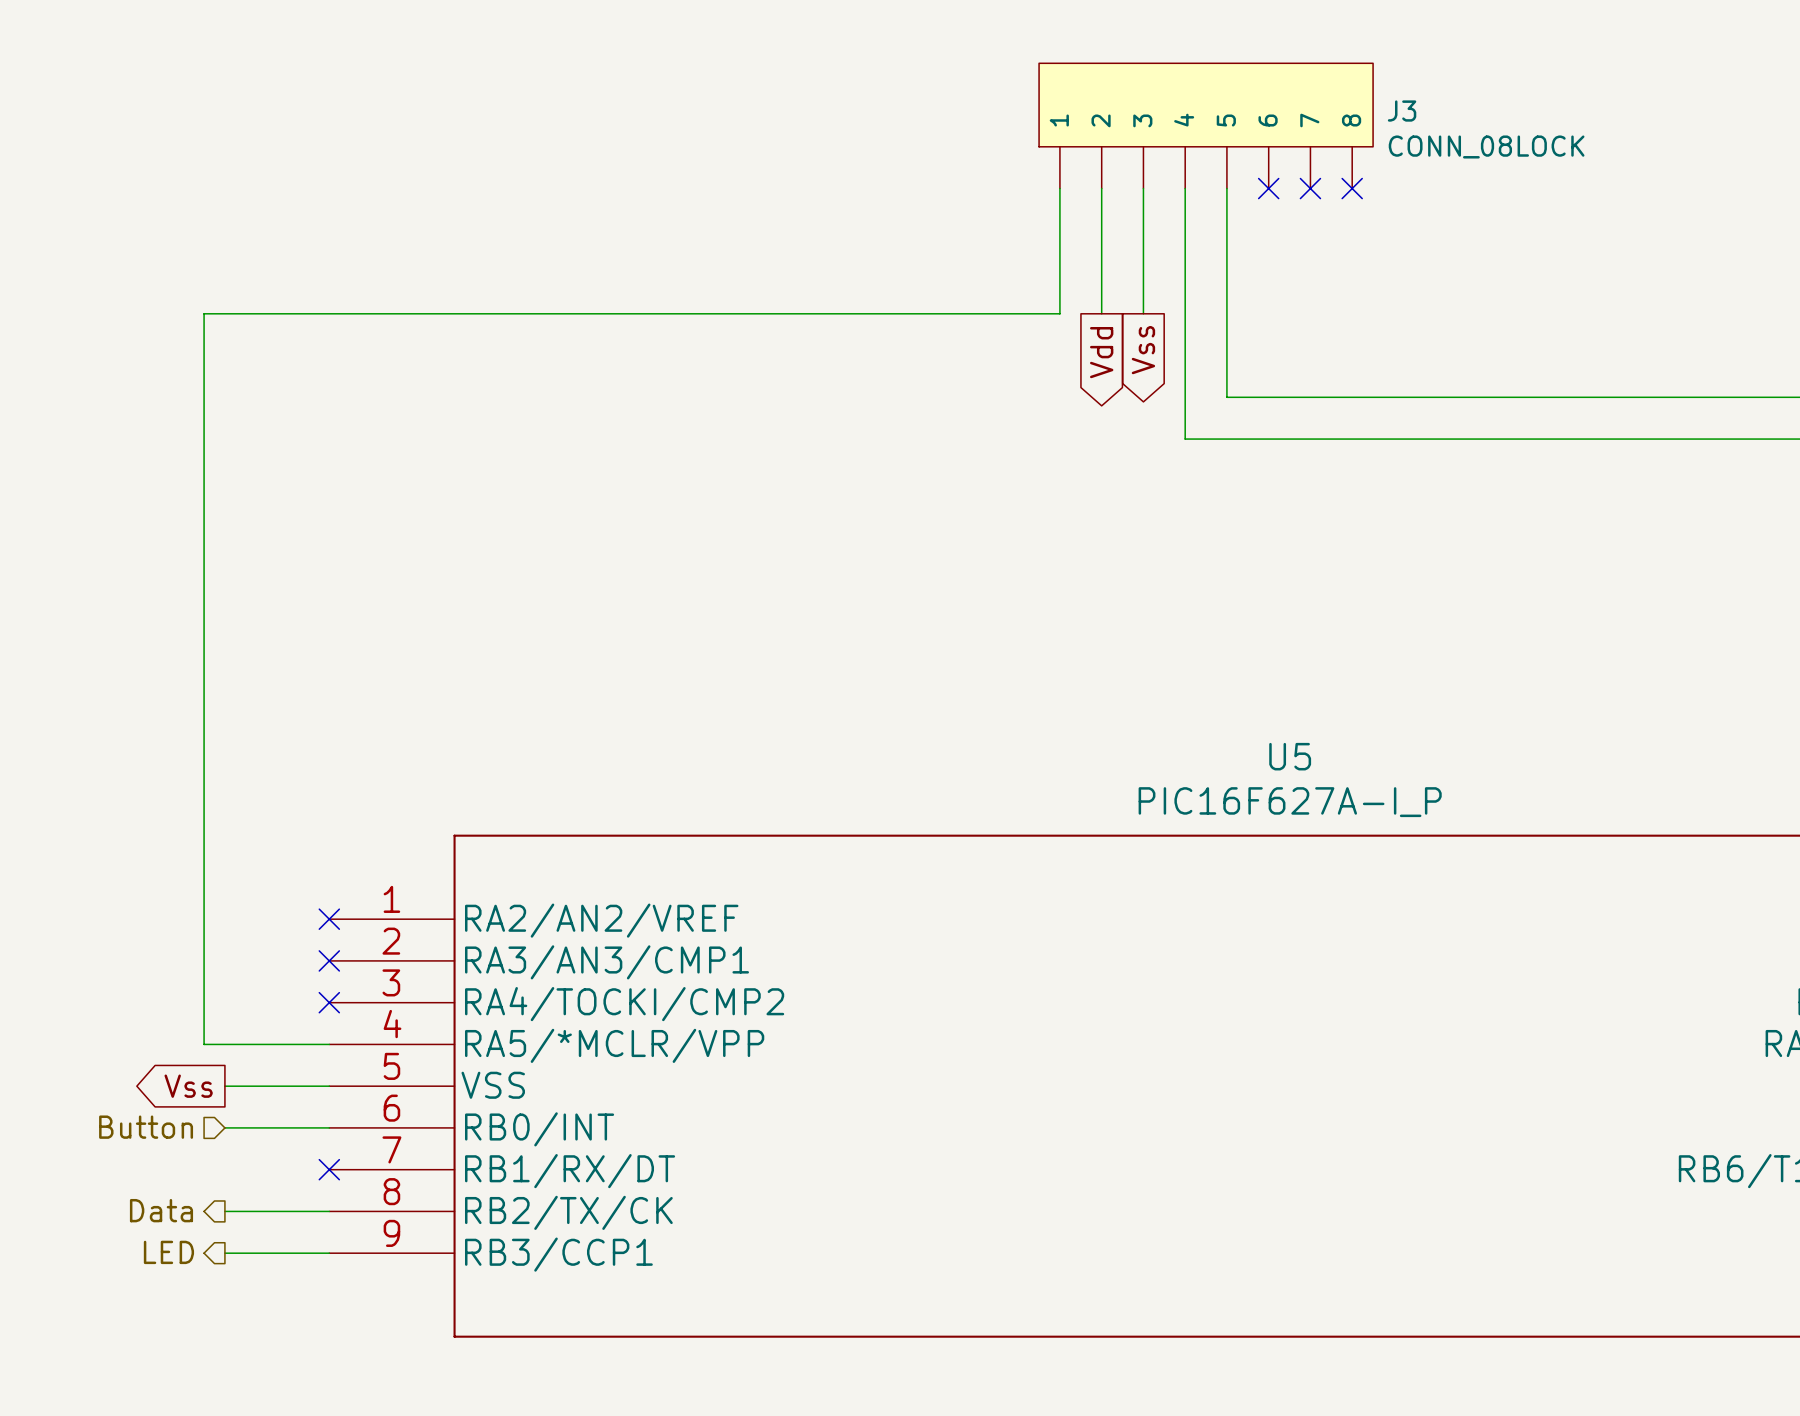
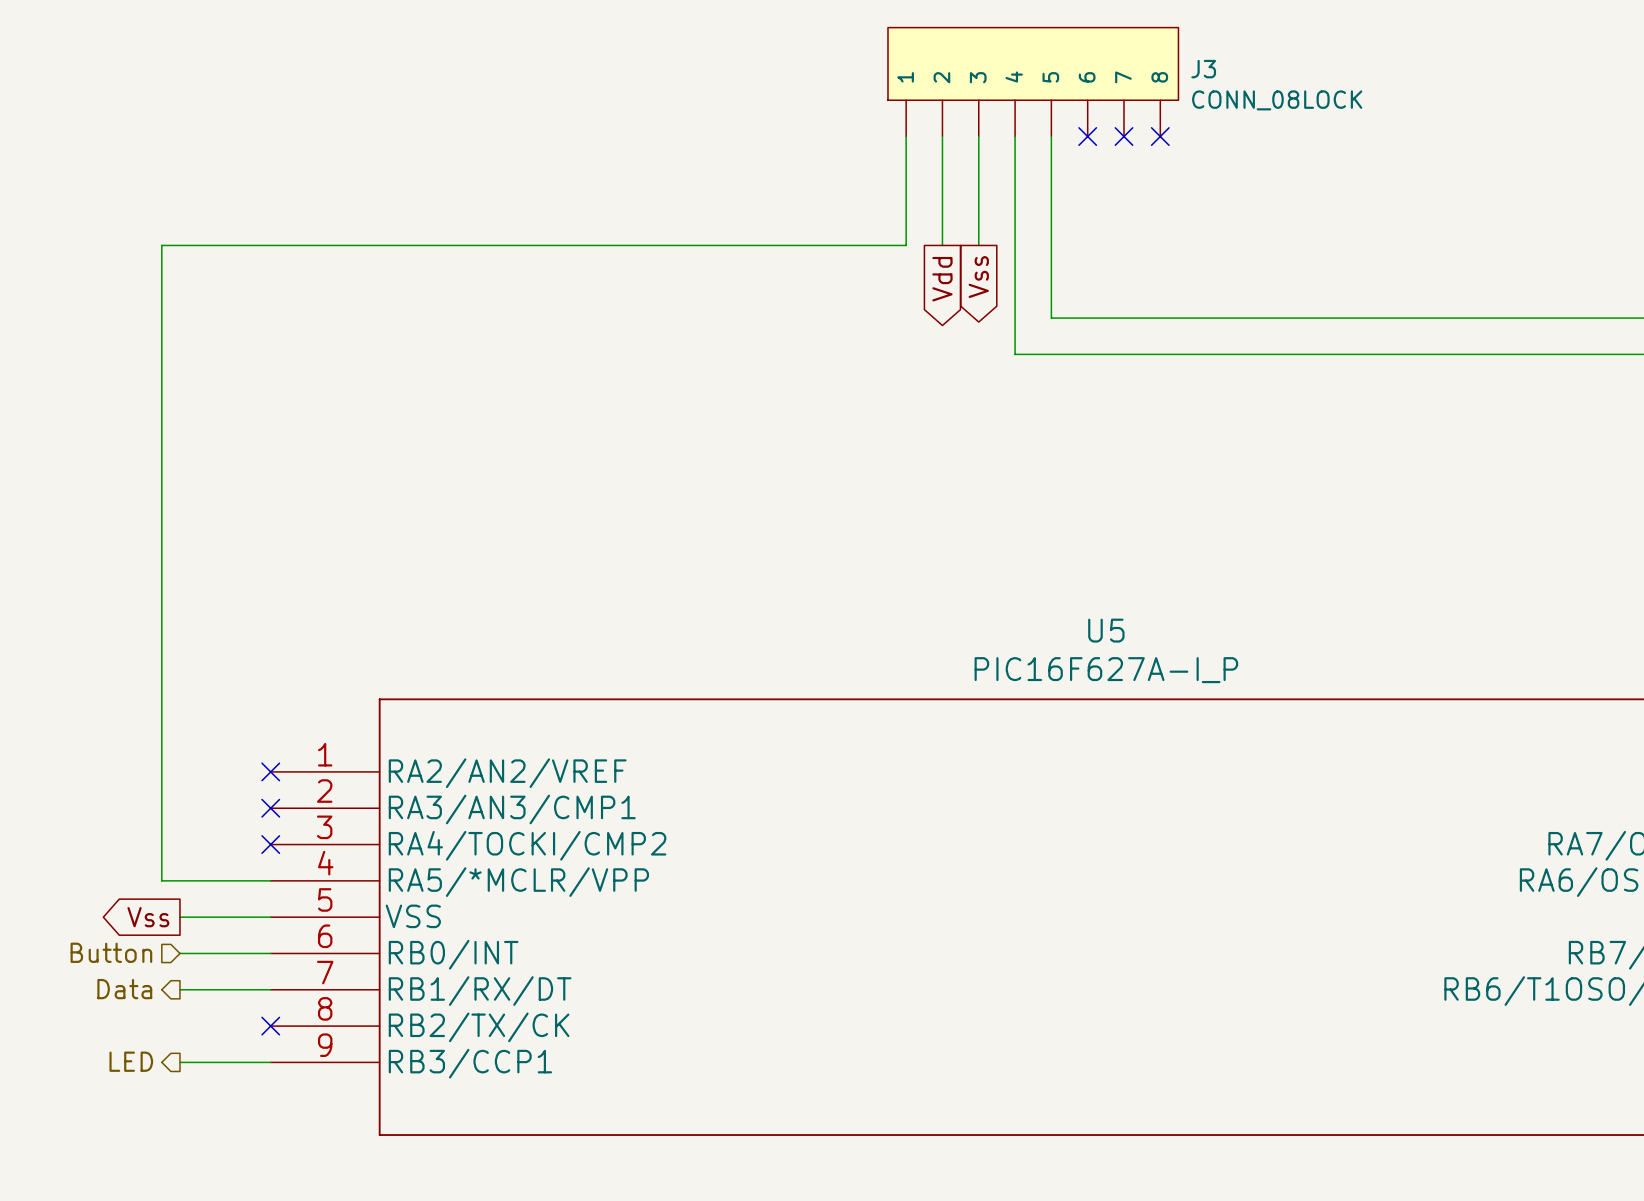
no-connect mark position: (329, 1169) -> (270, 1026)
hierarchical label position: Data (161, 1210) -> Data (124, 989)
wire: (224, 1211) (329, 1211) -> (179, 989) (270, 989)

